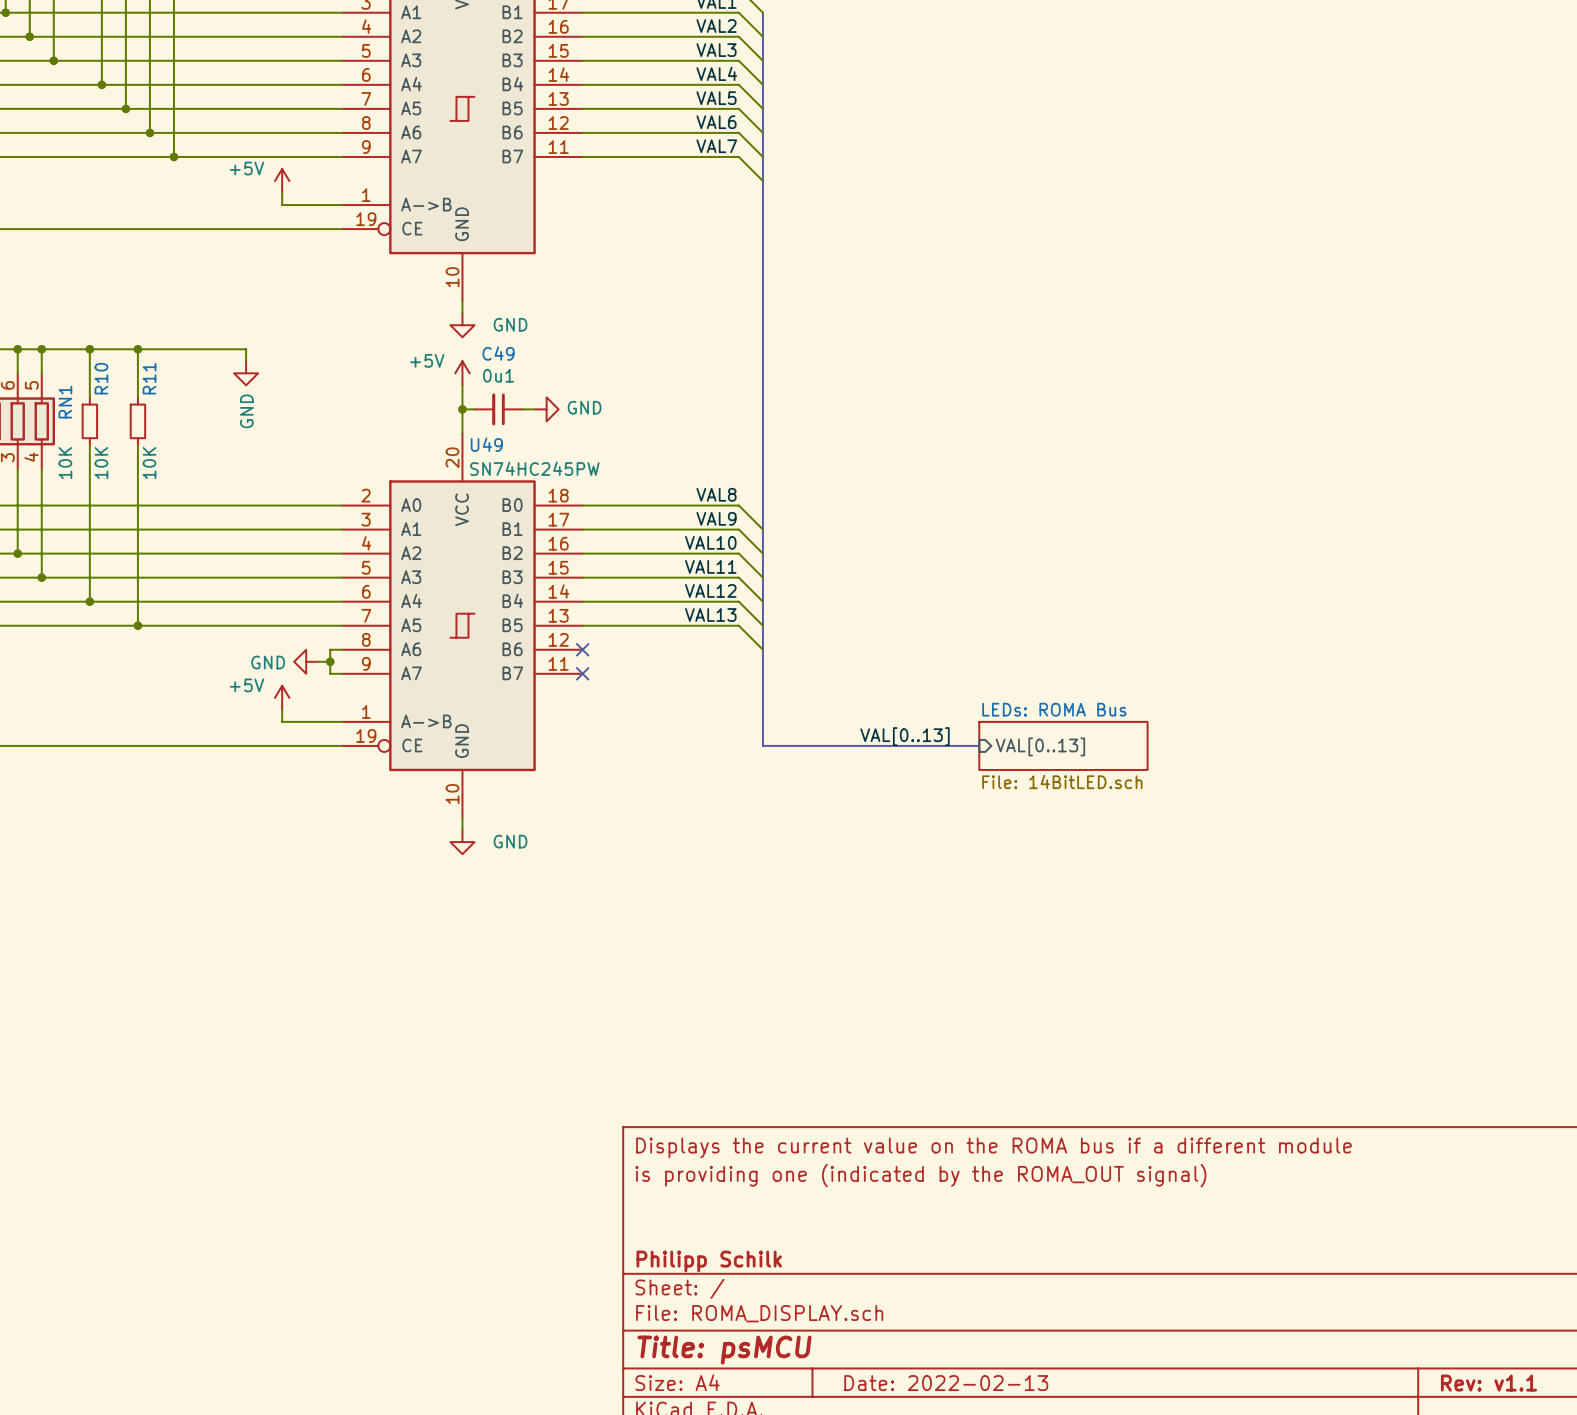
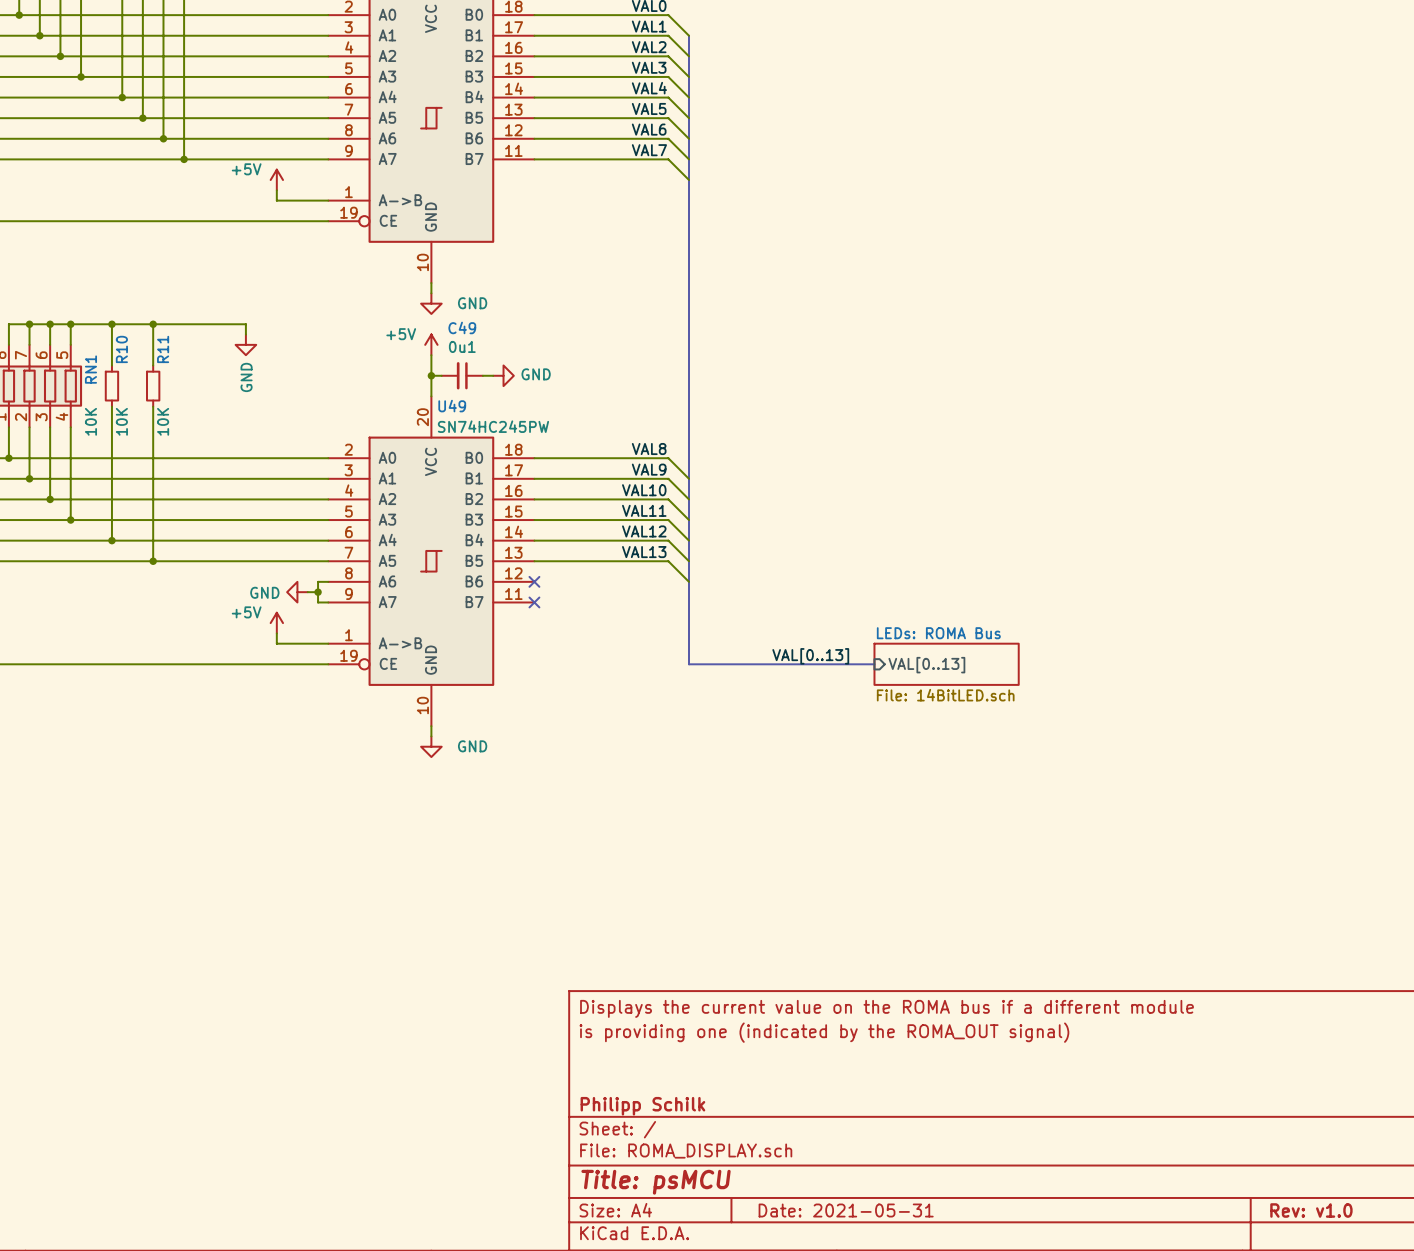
title block: Date: 2022-02-13 (946, 1383) -> Date: 2021-05-31 (846, 1210)
title block: Rev: v1.1 (1489, 1383) -> Rev: v1.0 (1311, 1210)

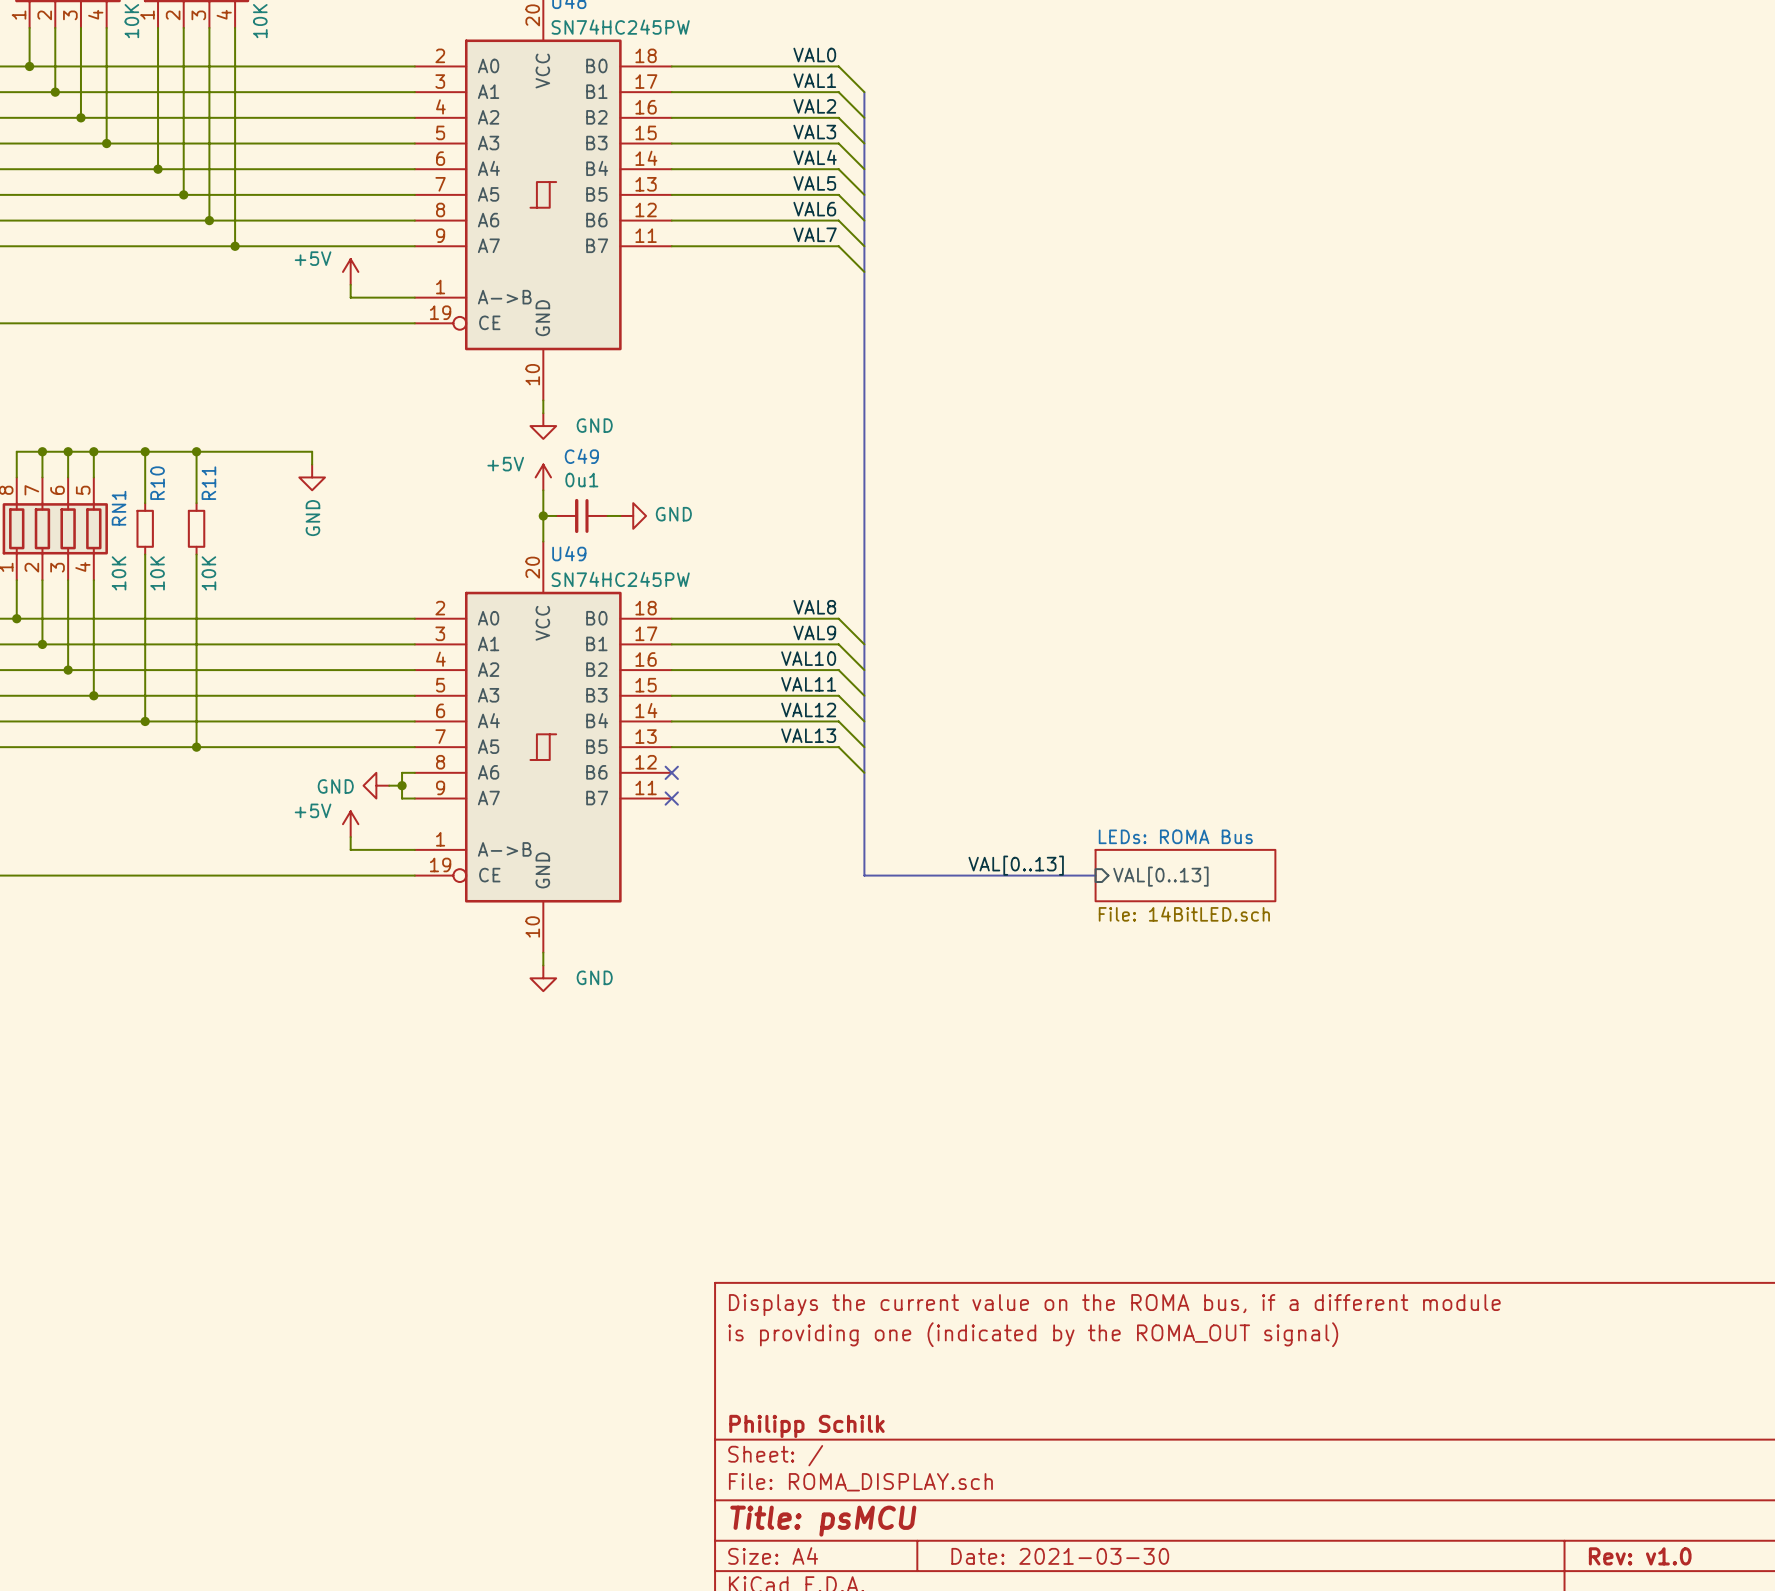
title block: Displays the current value on the ROMA bus if a different module (887, 1008) -> Displays the current value on the ROMA bus, if a different module (1114, 1305)
title block: Date: 2021-05-31 (846, 1210) -> Date: 2021-03-30 (1060, 1556)

